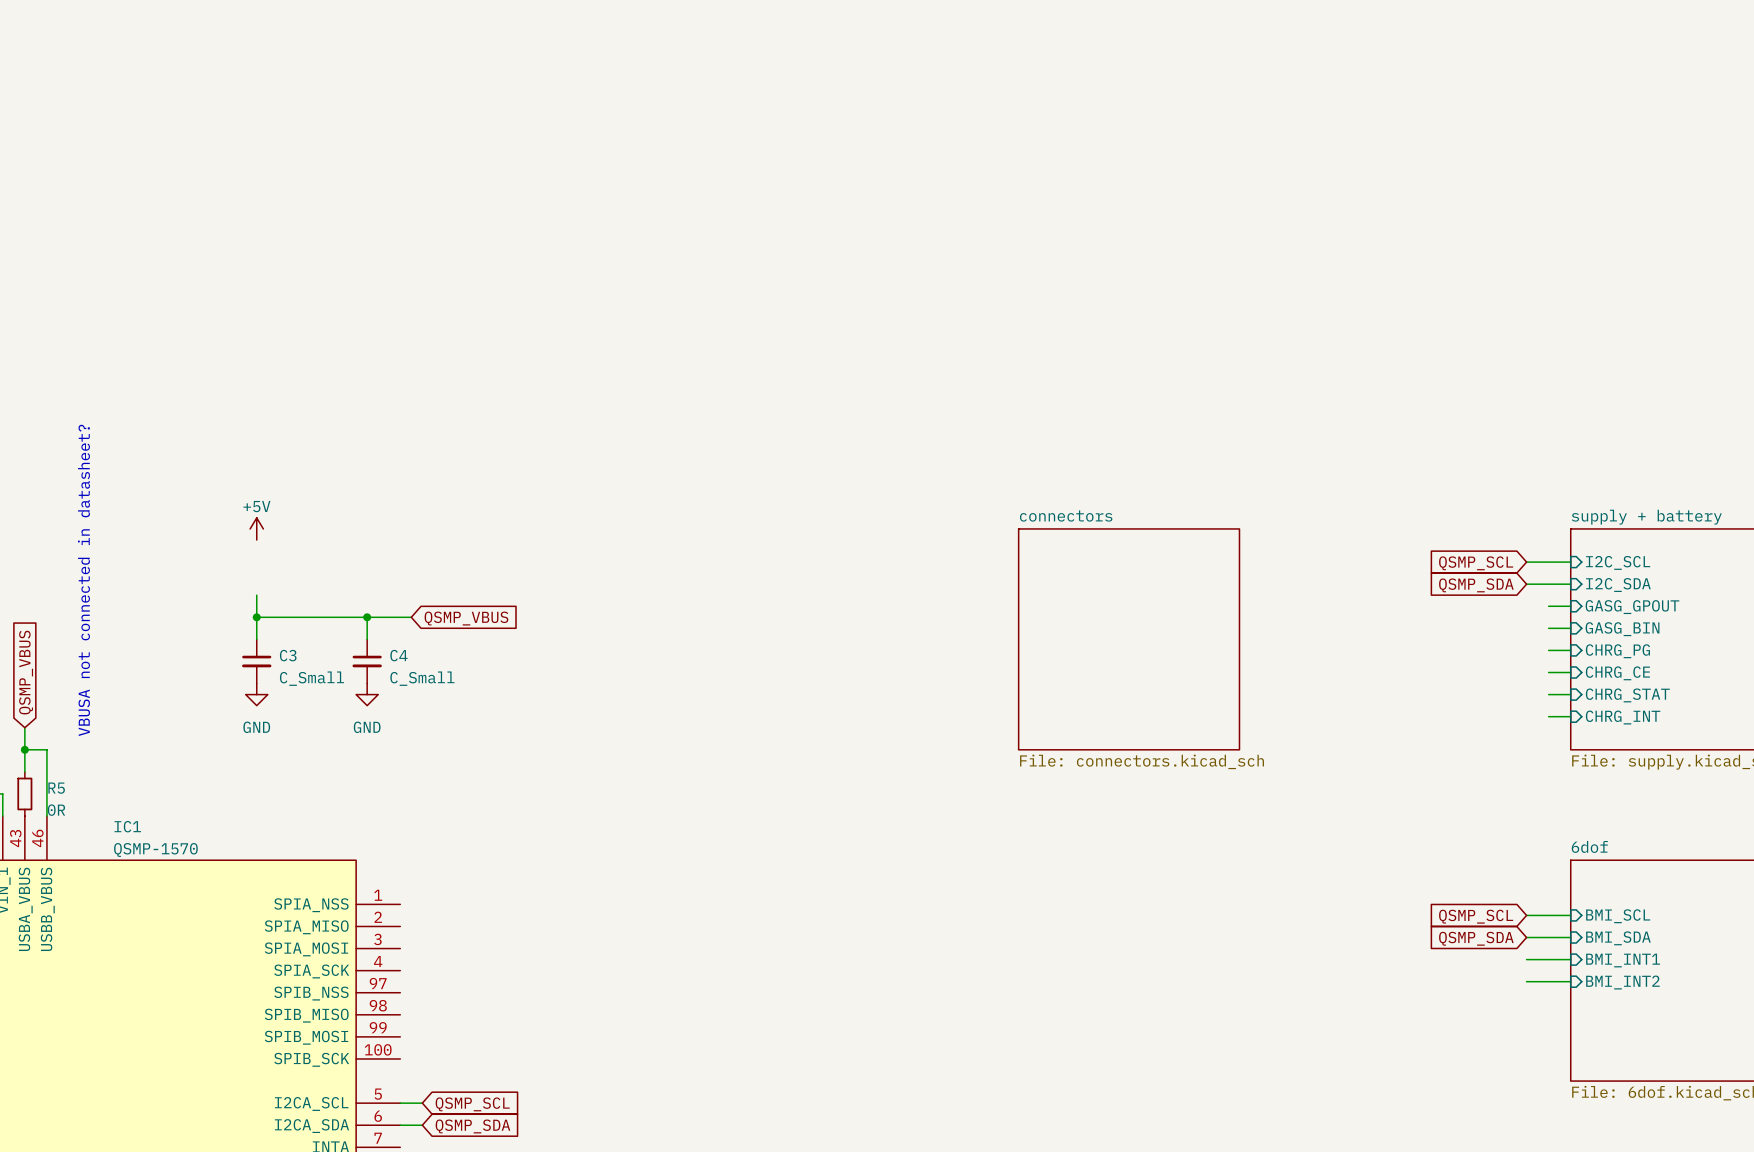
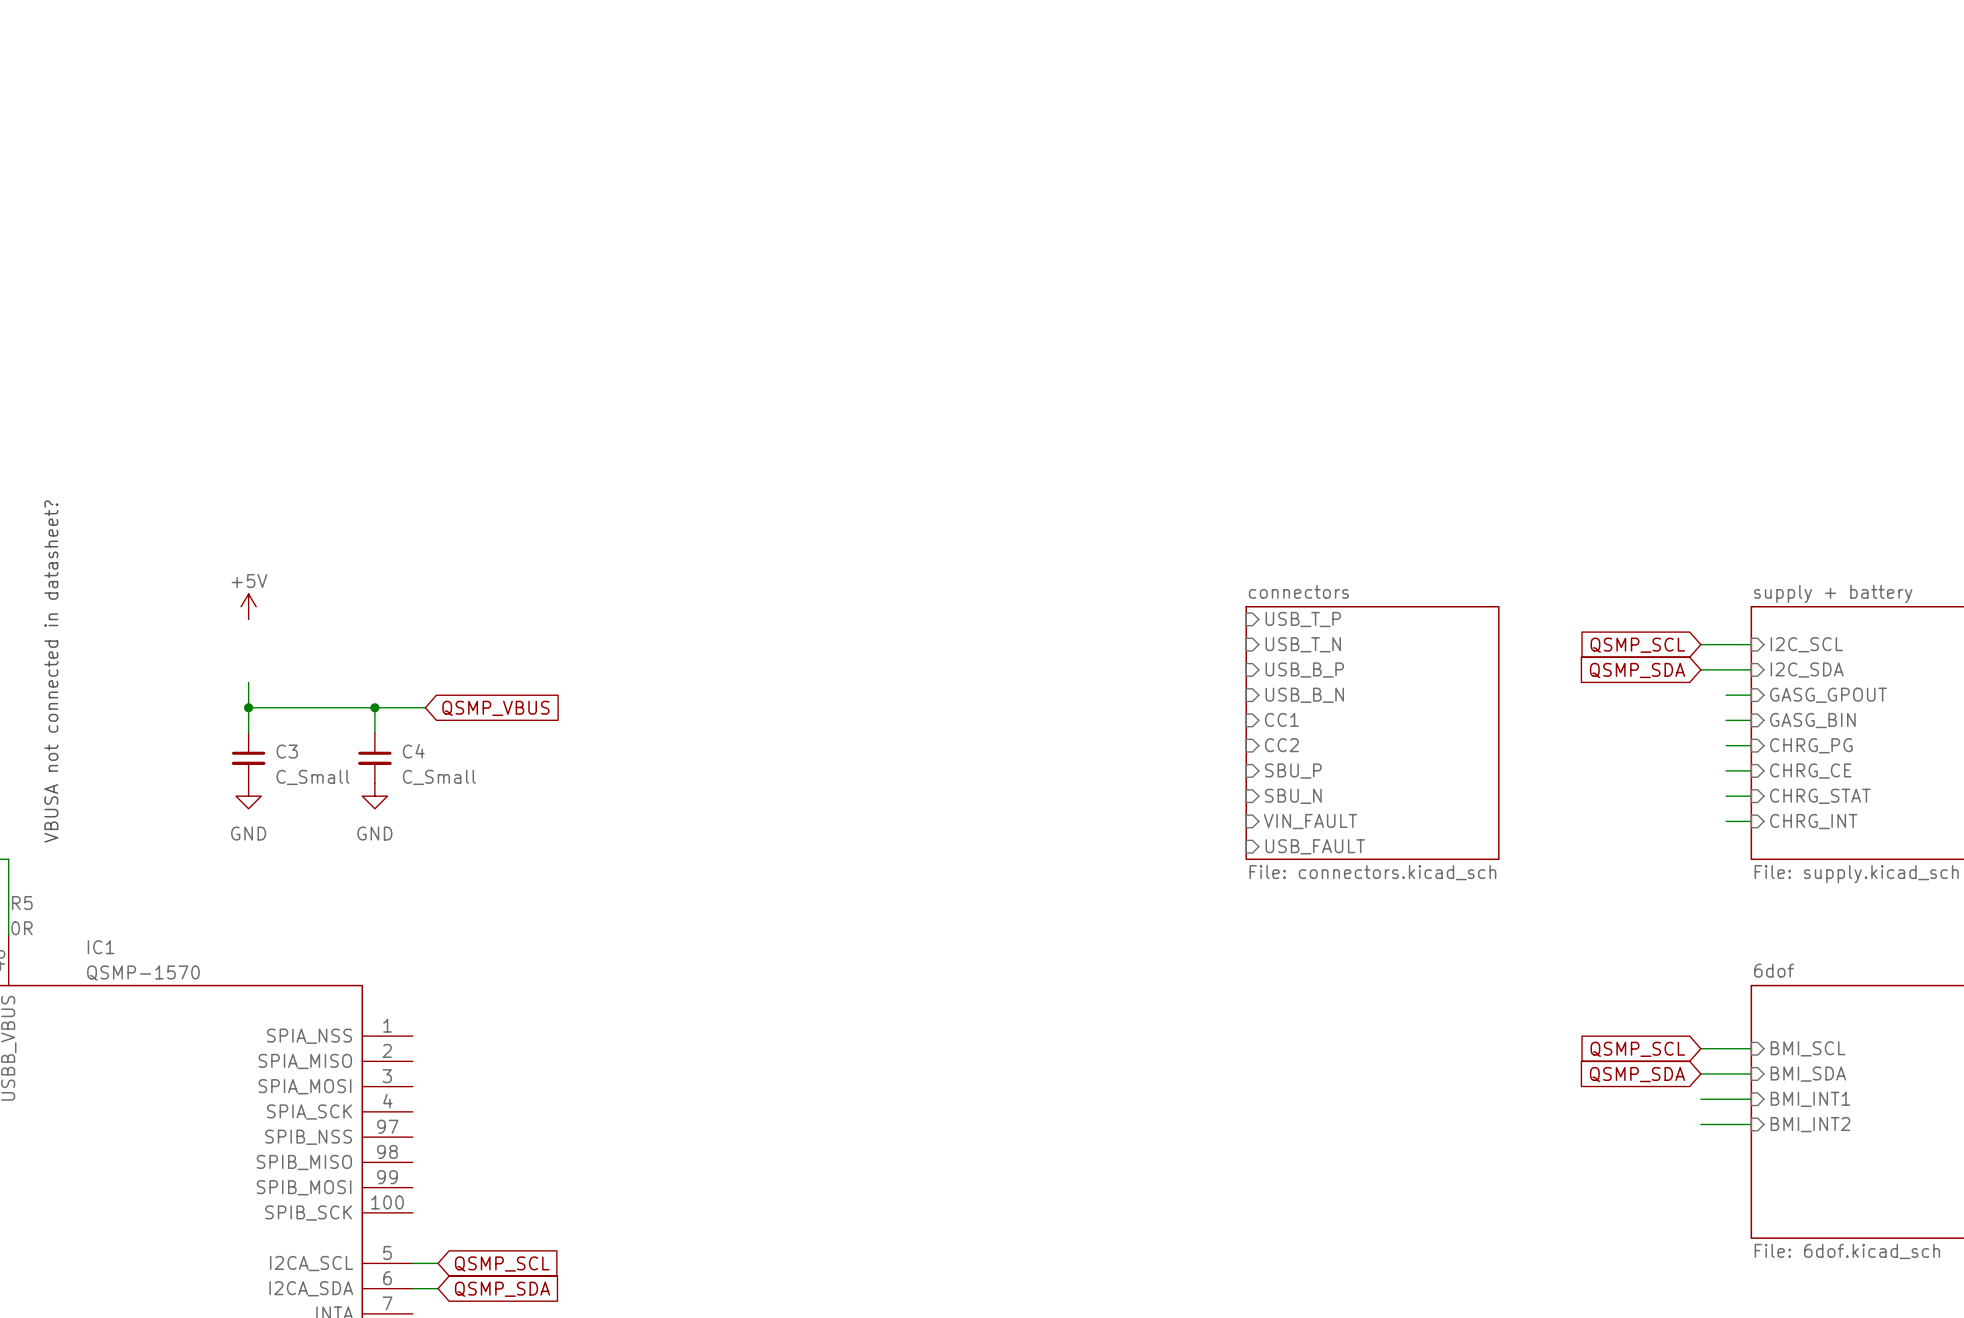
sheet pin: none -> USB_T_P (1303, 619)
sheet pin: none -> USB_T_N (1303, 644)
sheet pin: none -> USB_B_P (1304, 670)
sheet pin: none -> USB_B_N (1304, 695)
sheet pin: none -> CC1 (1281, 719)
sheet connectors position: (1129, 639) -> (1372, 733)
sheet pin: none -> CC2 (1281, 745)
sheet pin: none -> SBU_P (1293, 771)
sheet pin: none -> SBU_N (1293, 796)
sheet pin: none -> VIN_FAULT (1310, 821)
sheet pin: none -> USB_FAULT (1315, 846)

